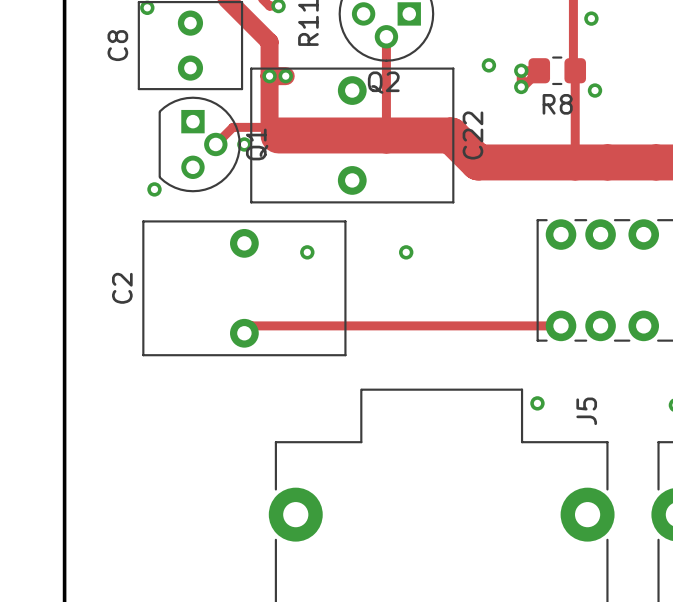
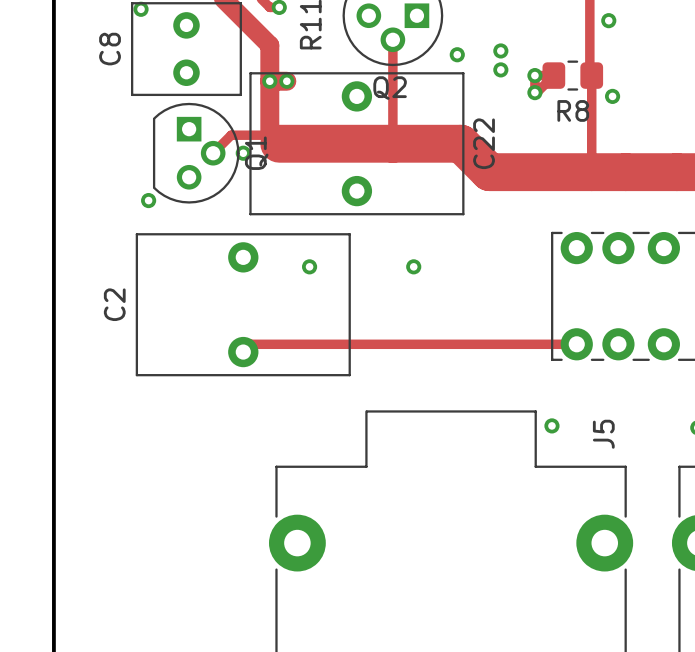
via: none -> (500, 50)
via: none -> (457, 54)

